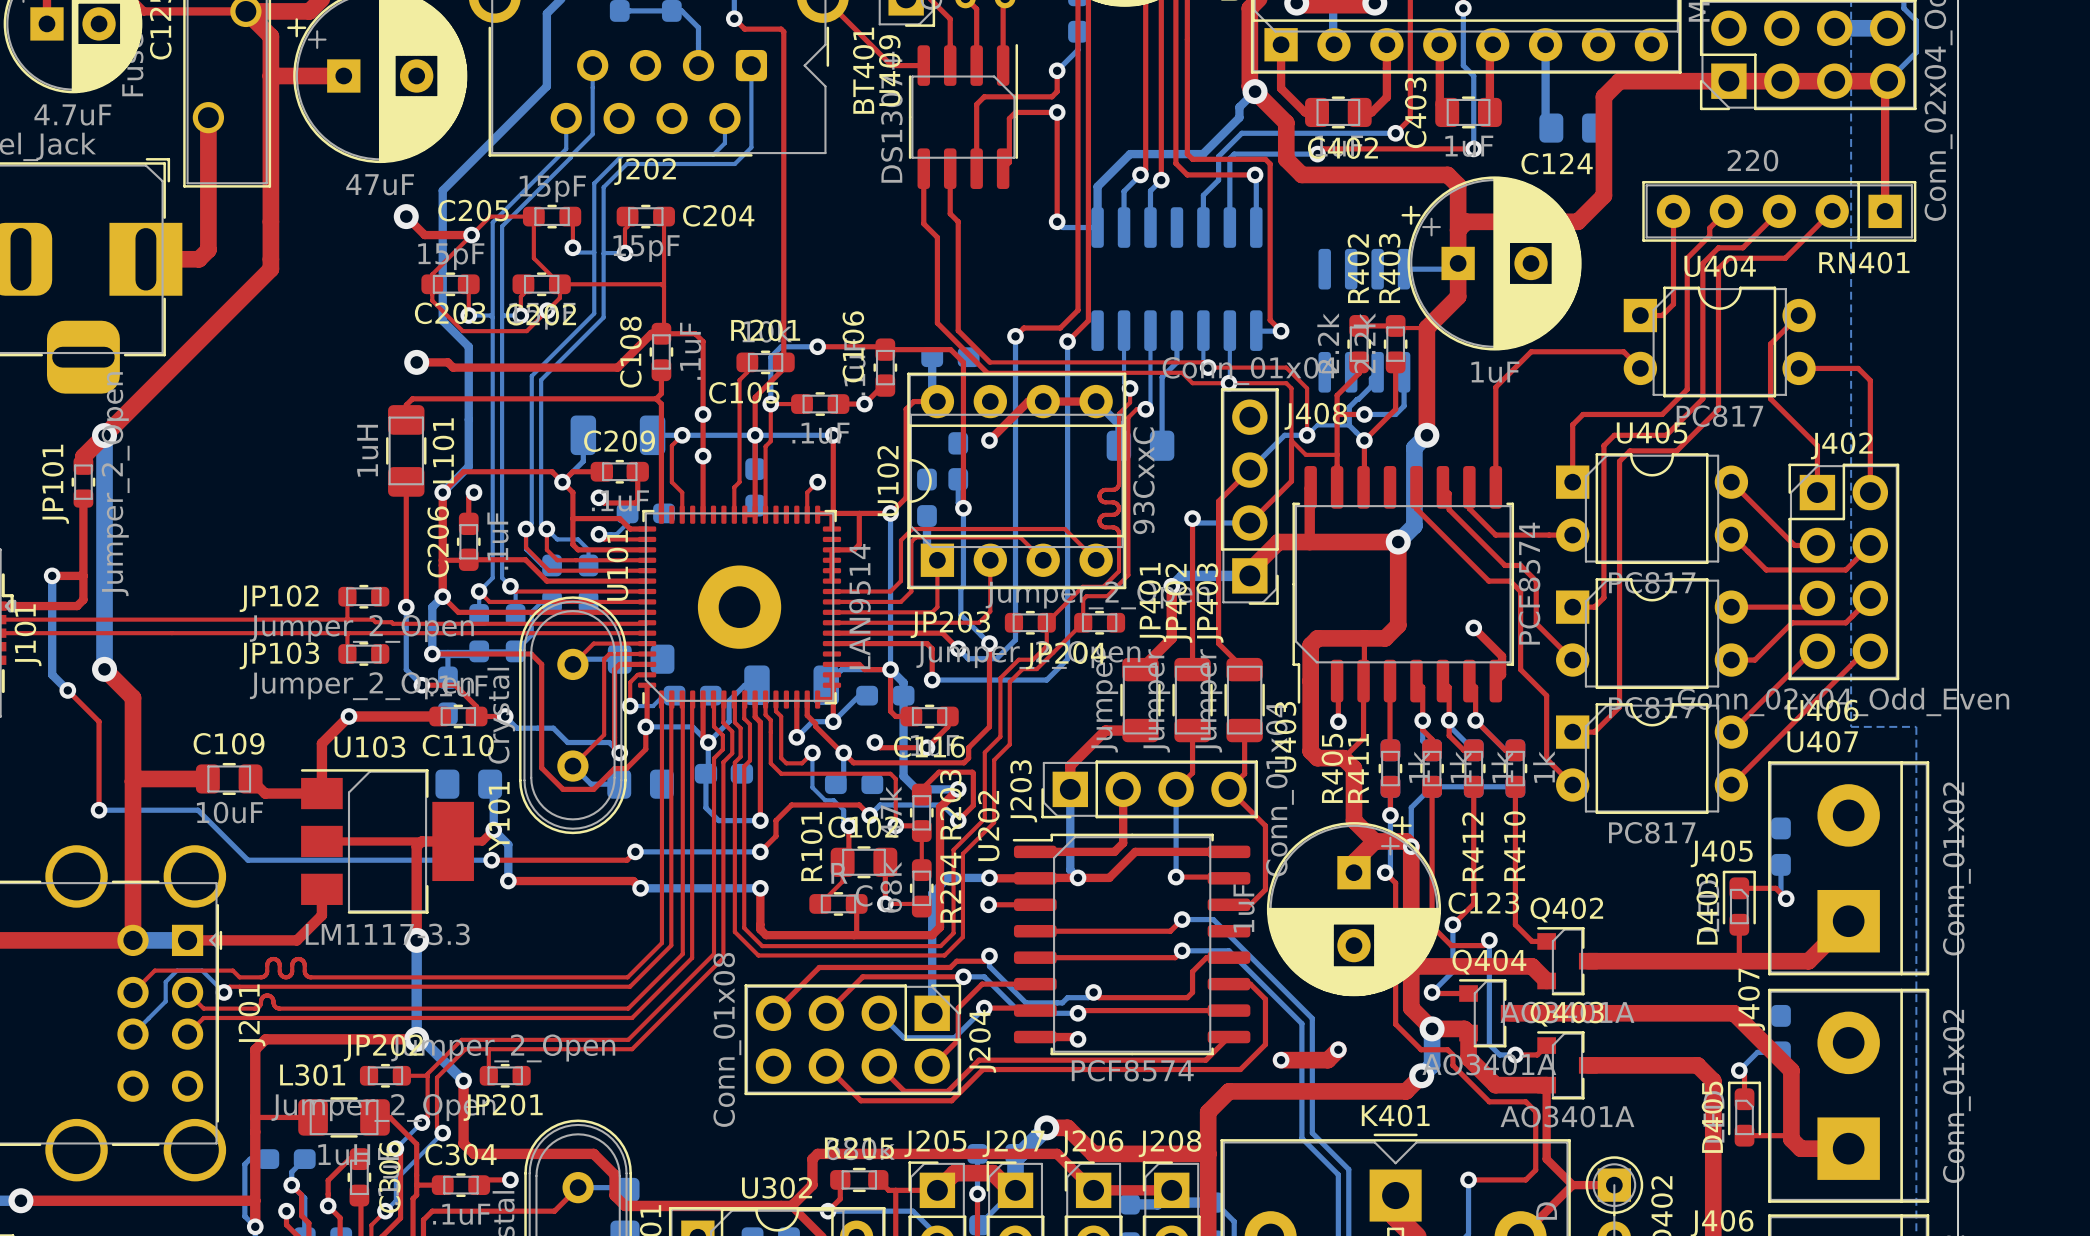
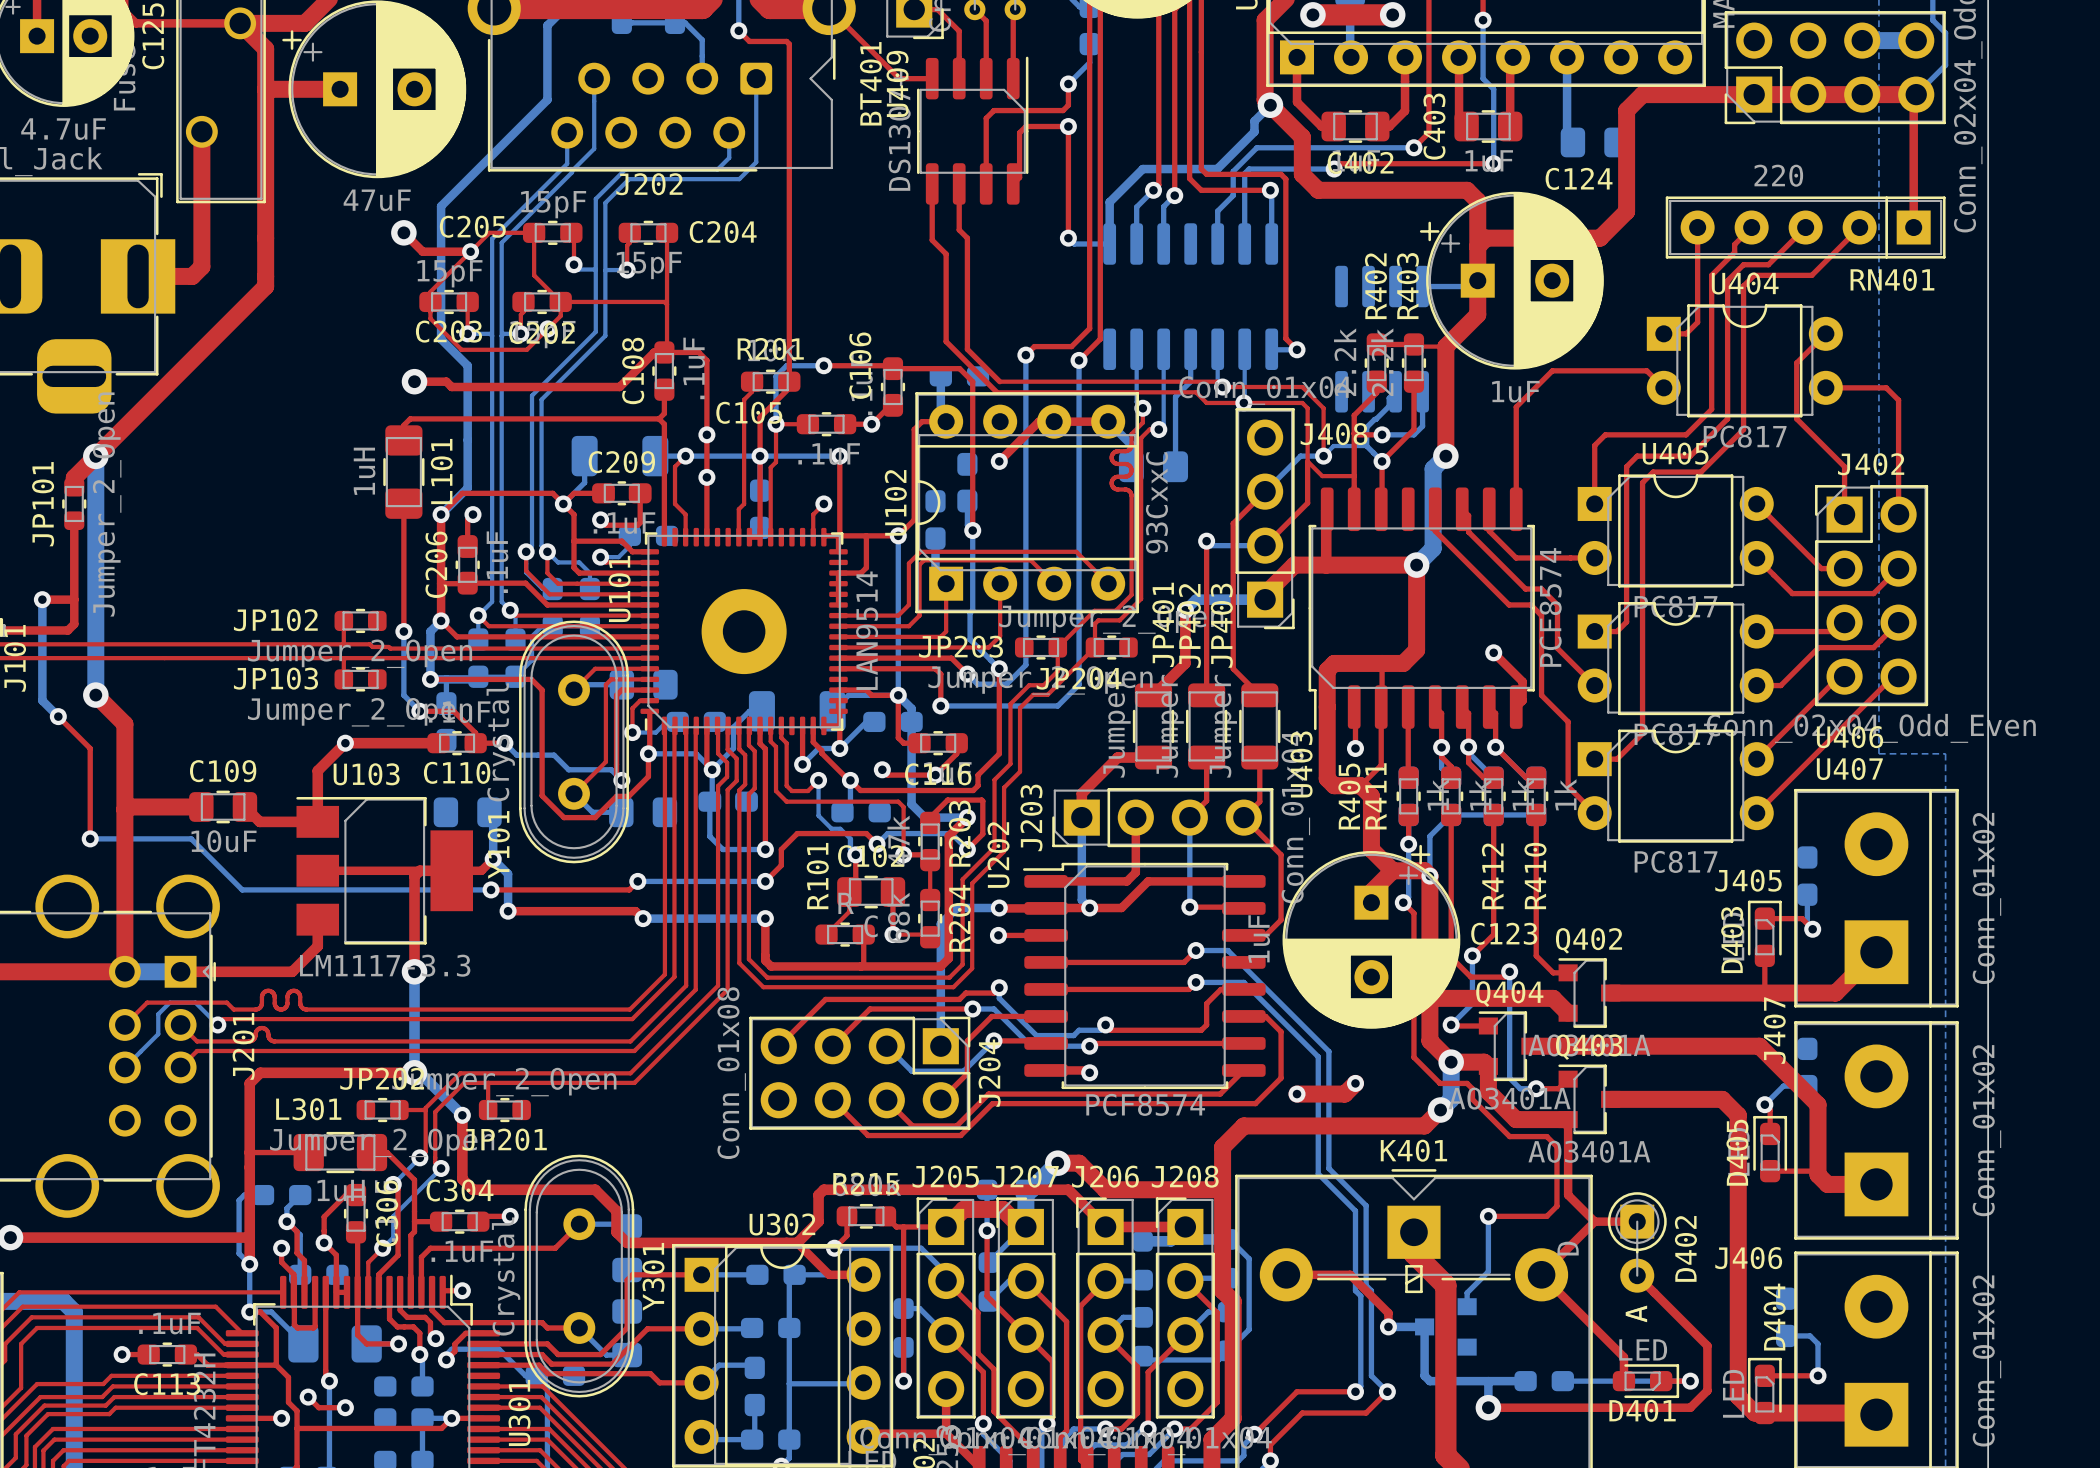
top track: (1119, 424) (1119, 474) -> (1131, 444) (1127, 450) (1114, 452) (1111, 457) (1115, 463) (1129, 465) (1131, 470) (1127, 476) (1114, 478) (1112, 485) (1116, 489) (1127, 490) (1131, 495)
top track: (1119, 483) (1115, 489) (1101, 491) (1099, 496) (1103, 501) (1114, 502) (1118, 505) (1116, 513) (1103, 515) (1099, 521) (1103, 526) (1116, 528) (1119, 533) -> (1131, 505) (1131, 556)

